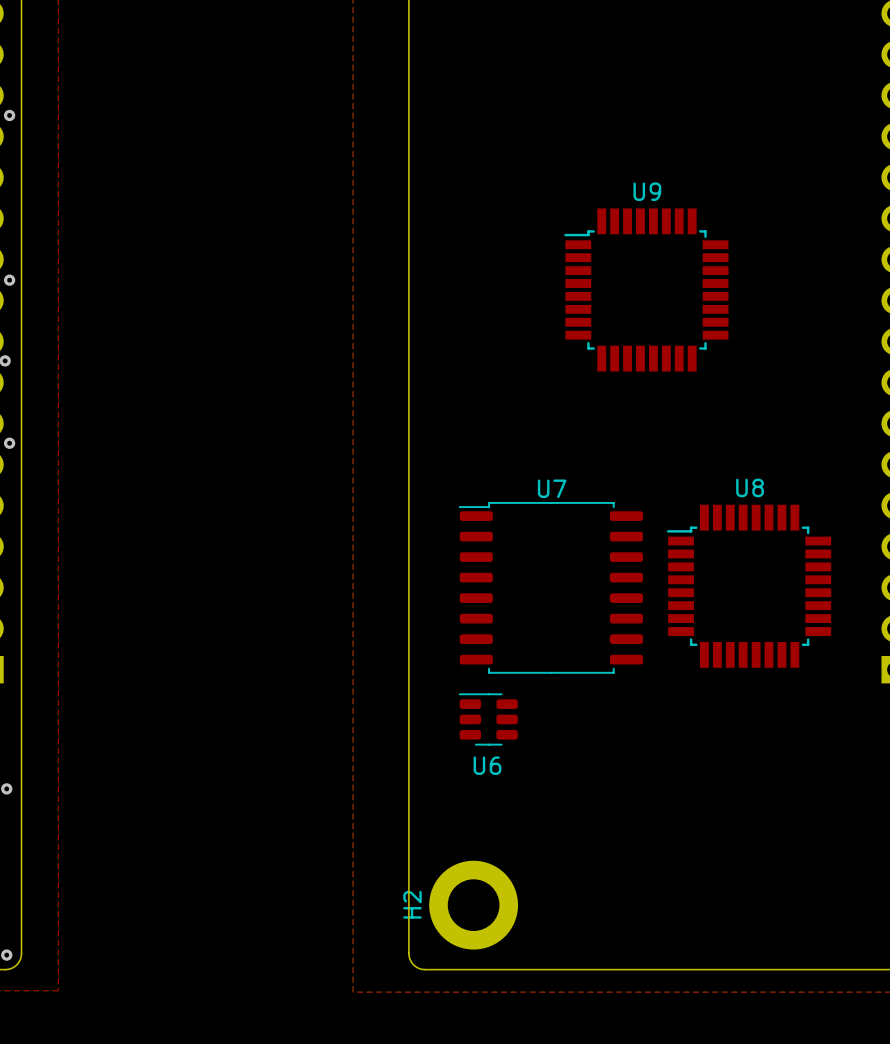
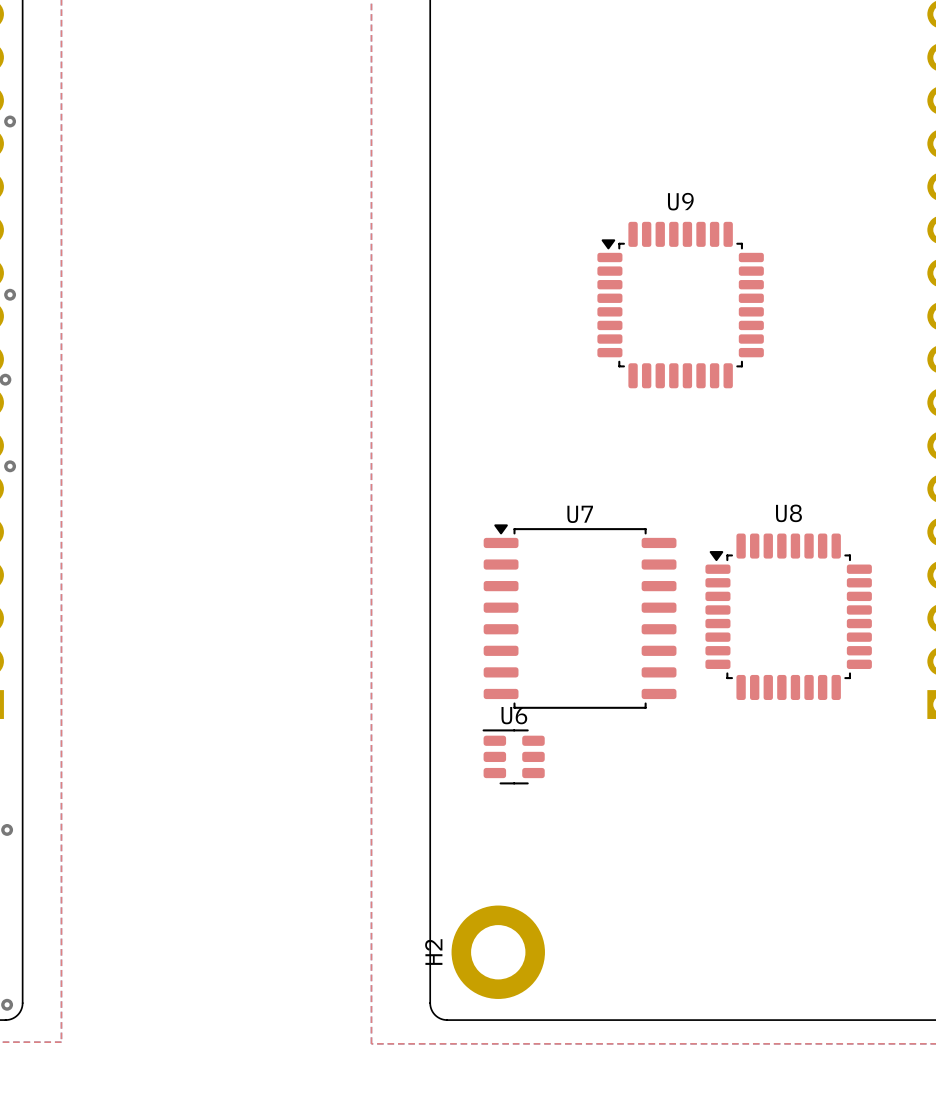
U9 footprint: [564, 208, 729, 372] -> [597, 221, 764, 389]
U7 footprint: [458, 501, 644, 674] -> [483, 524, 677, 709]
U8 footprint: [666, 504, 832, 668] -> [705, 533, 872, 701]
U6 name position: U6 (487, 765) -> U6 (514, 715)

